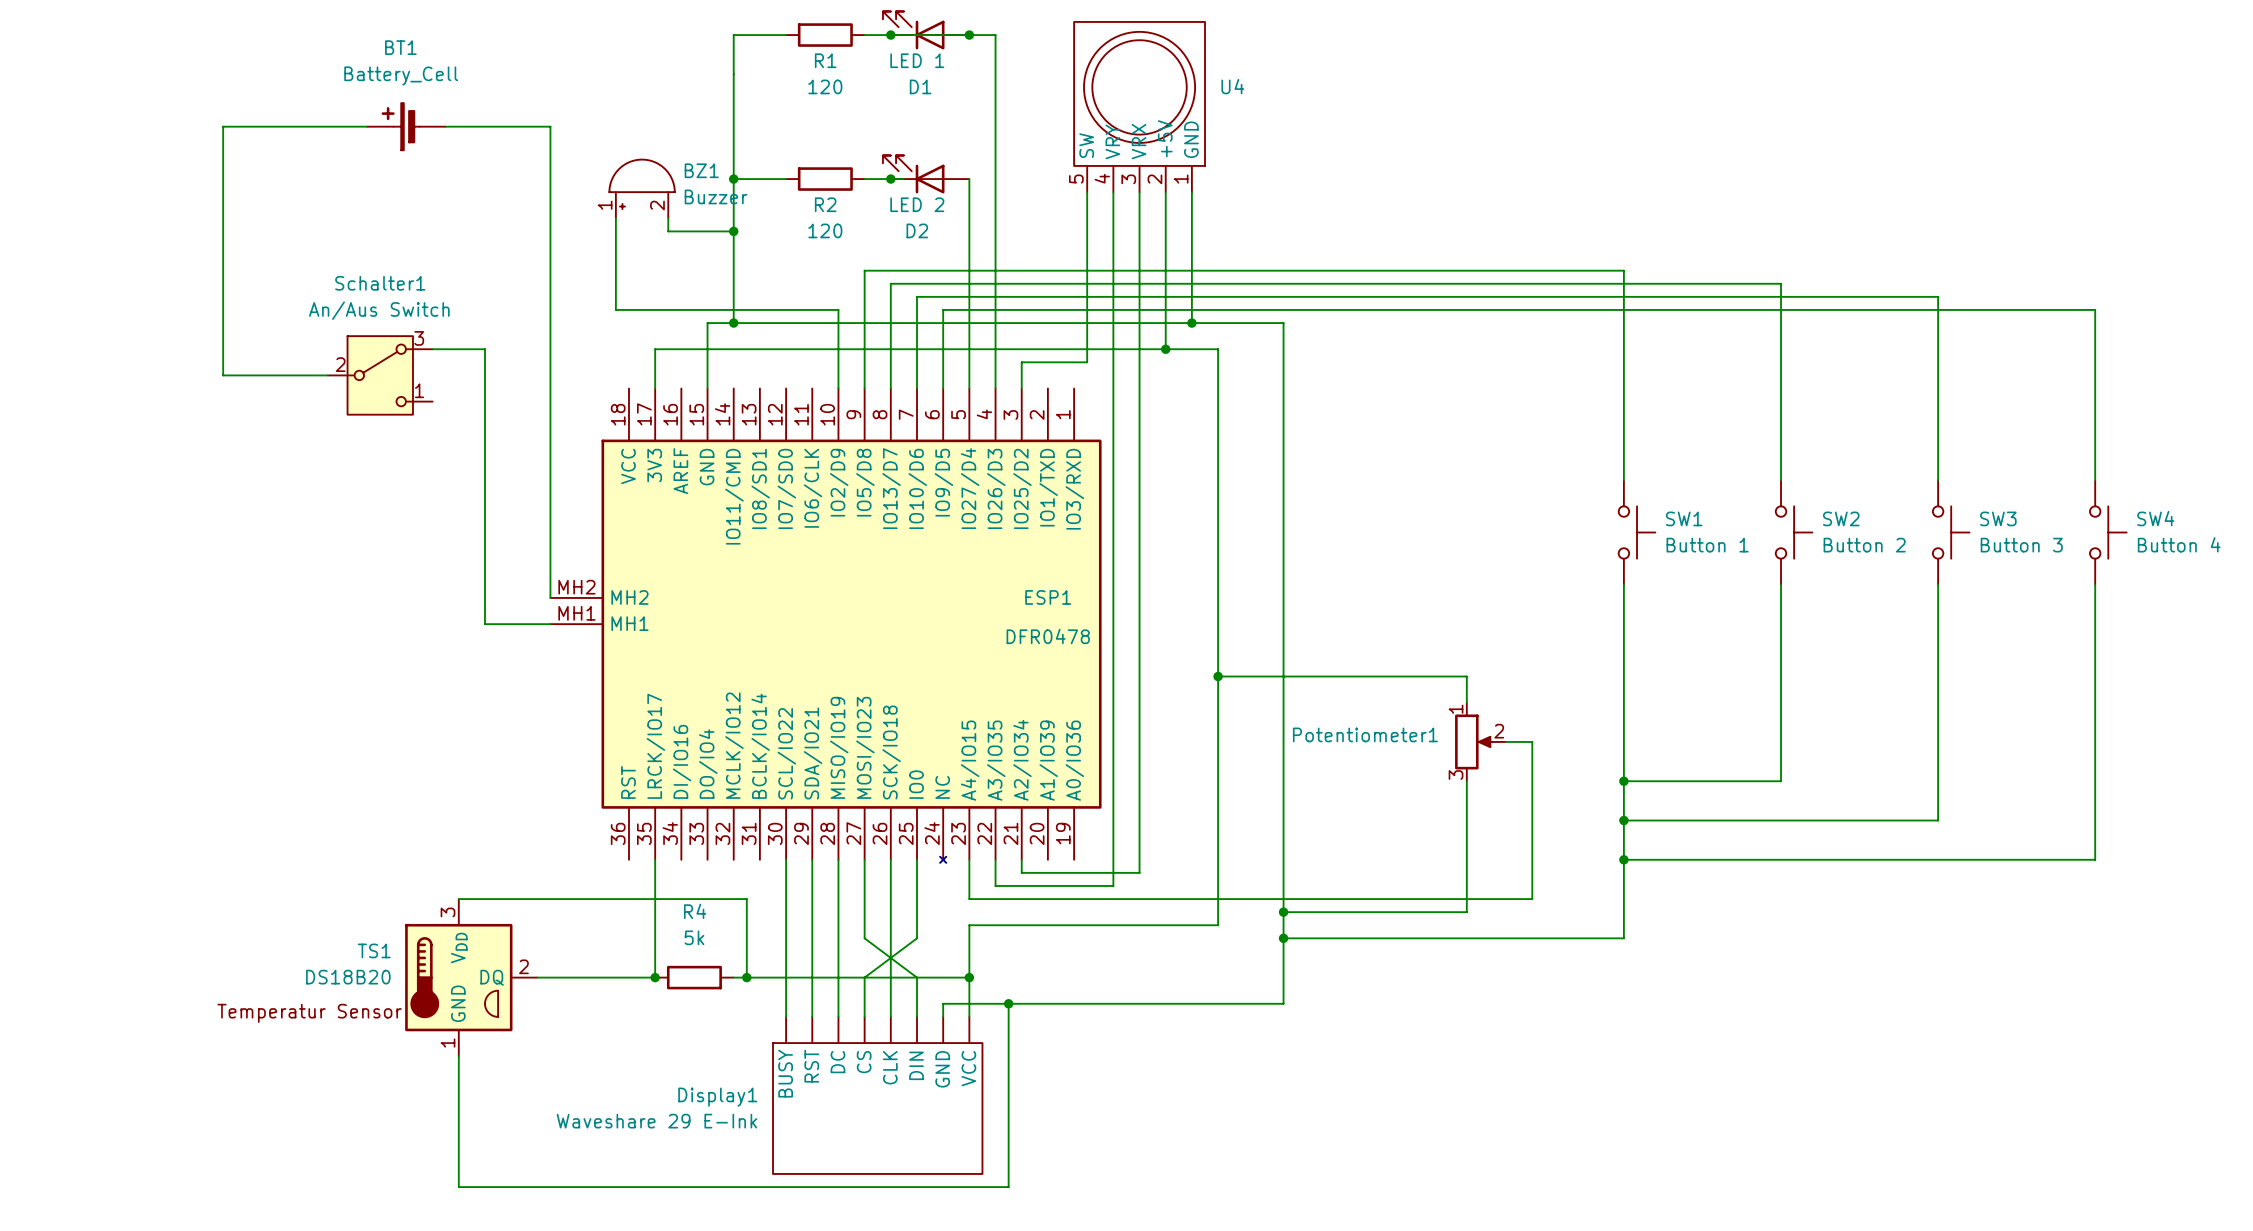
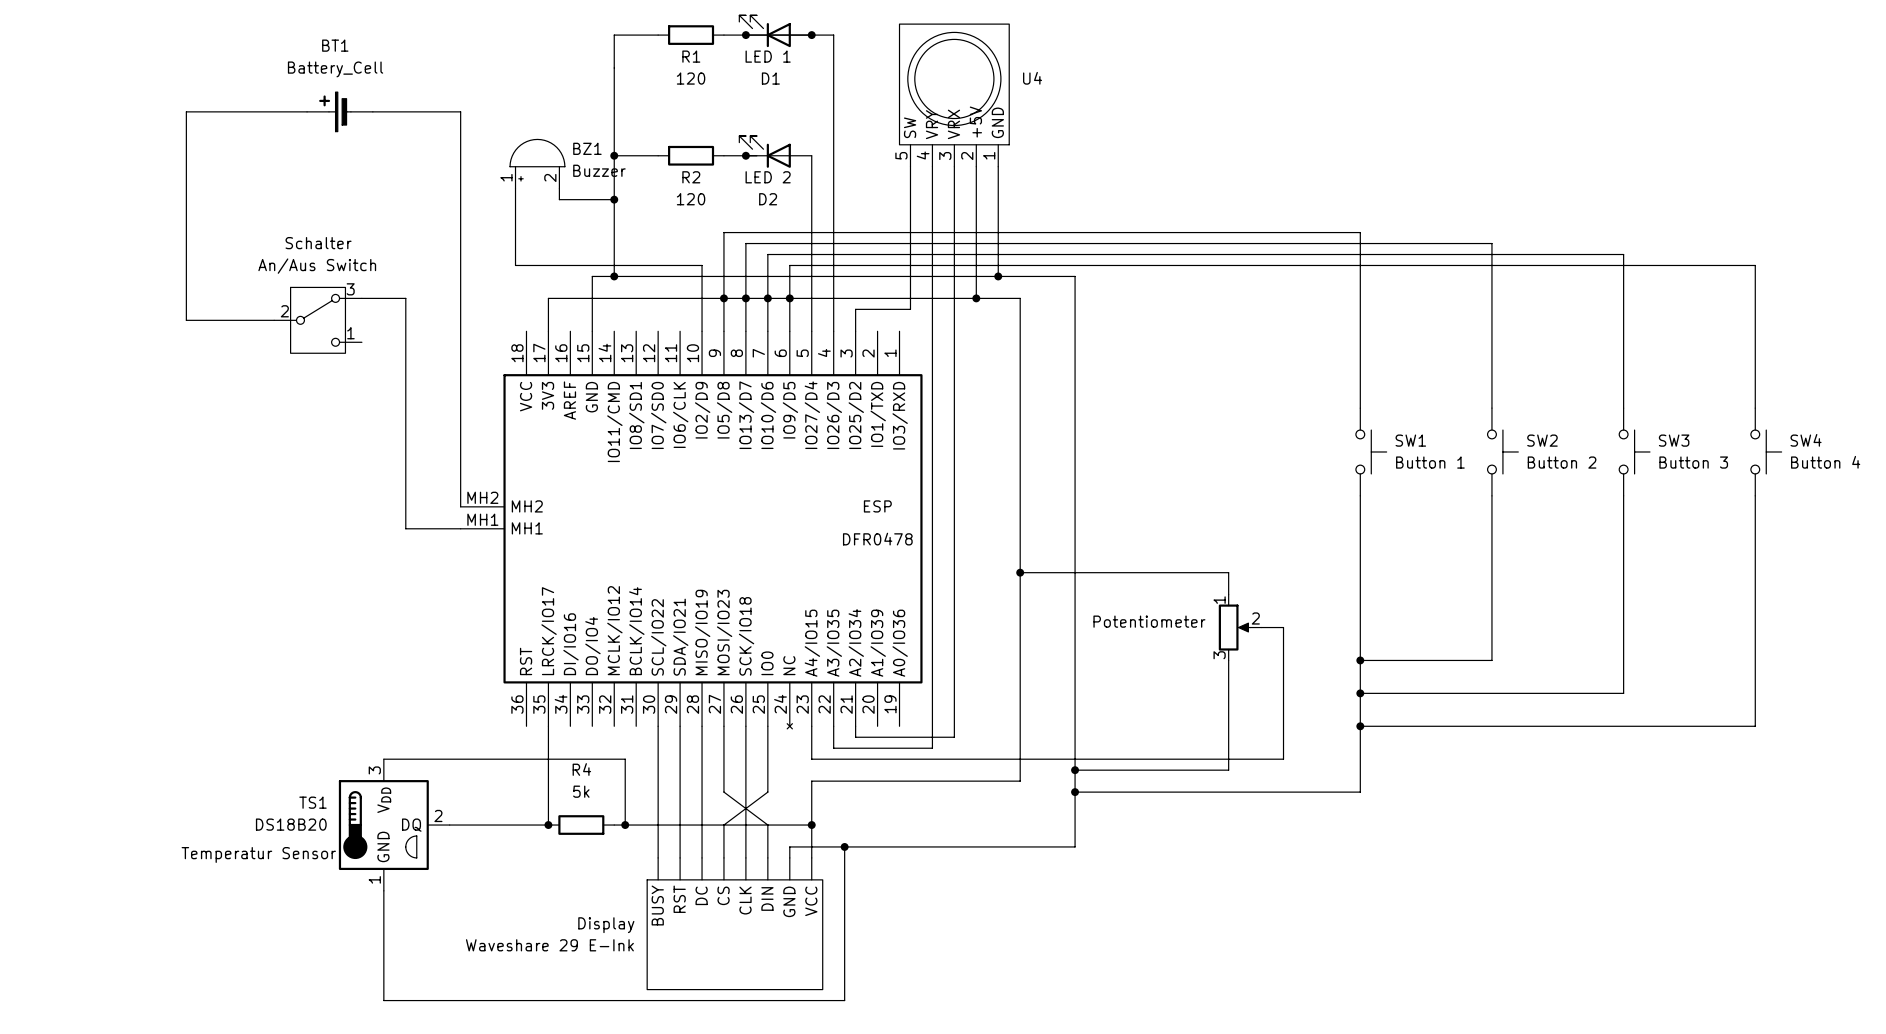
Schalter1 name: Schalter1 (380, 283) -> Schalter (318, 243)
junction: none -> (723, 298)
junction: none -> (745, 298)
junction: none -> (767, 298)
junction: none -> (789, 298)
ESP1 name: ESP1 (1048, 597) -> ESP (877, 506)
Potentiometer1 name: Potentiometer1 (1365, 734) -> Potentiometer (1149, 621)
Display1 name: Display1 (717, 1097) -> Display (606, 925)

